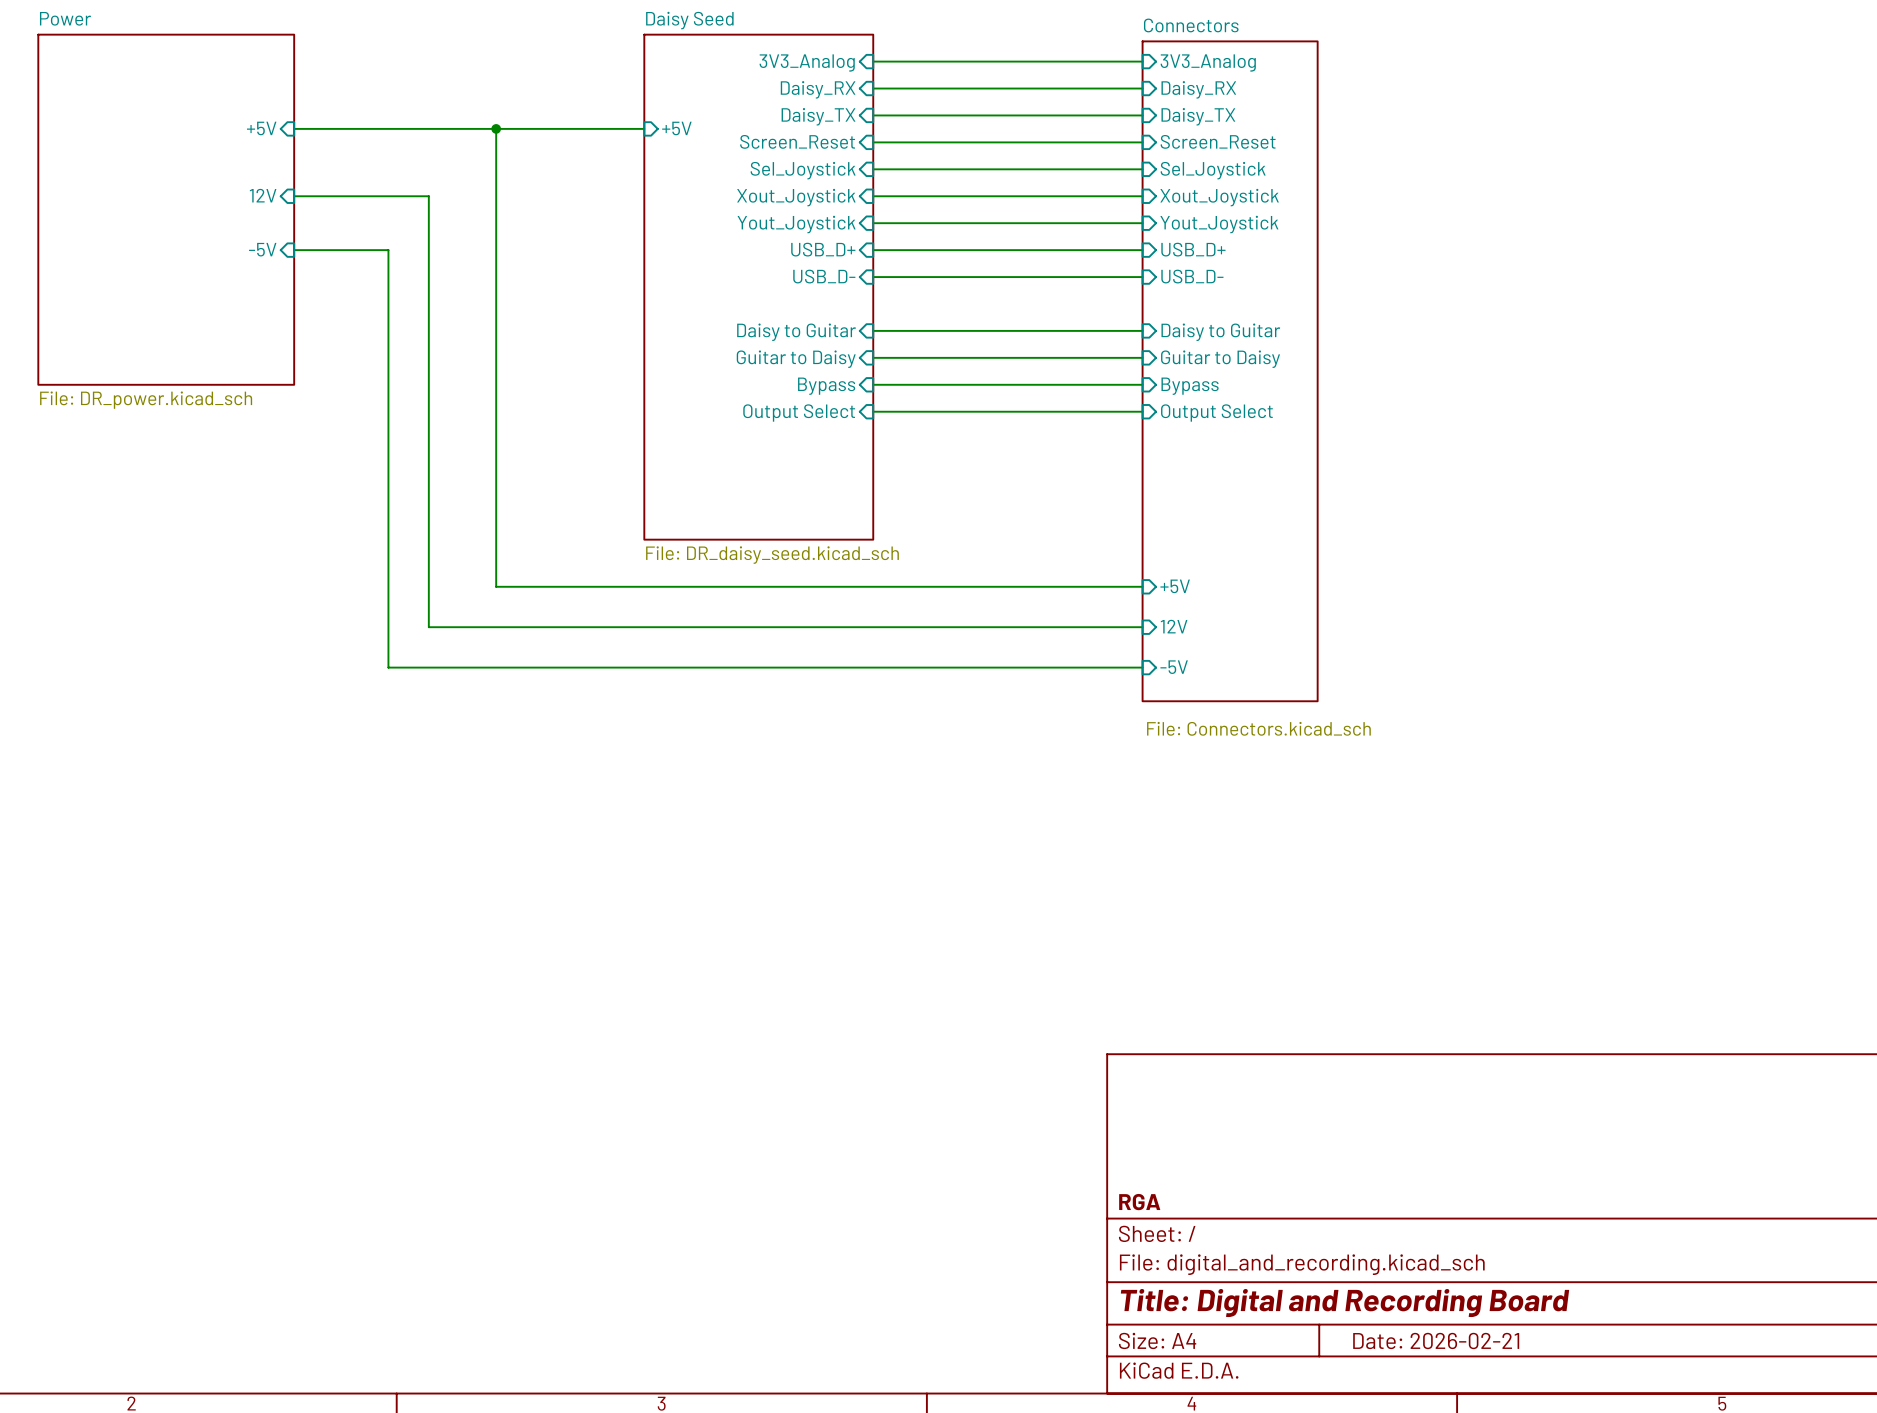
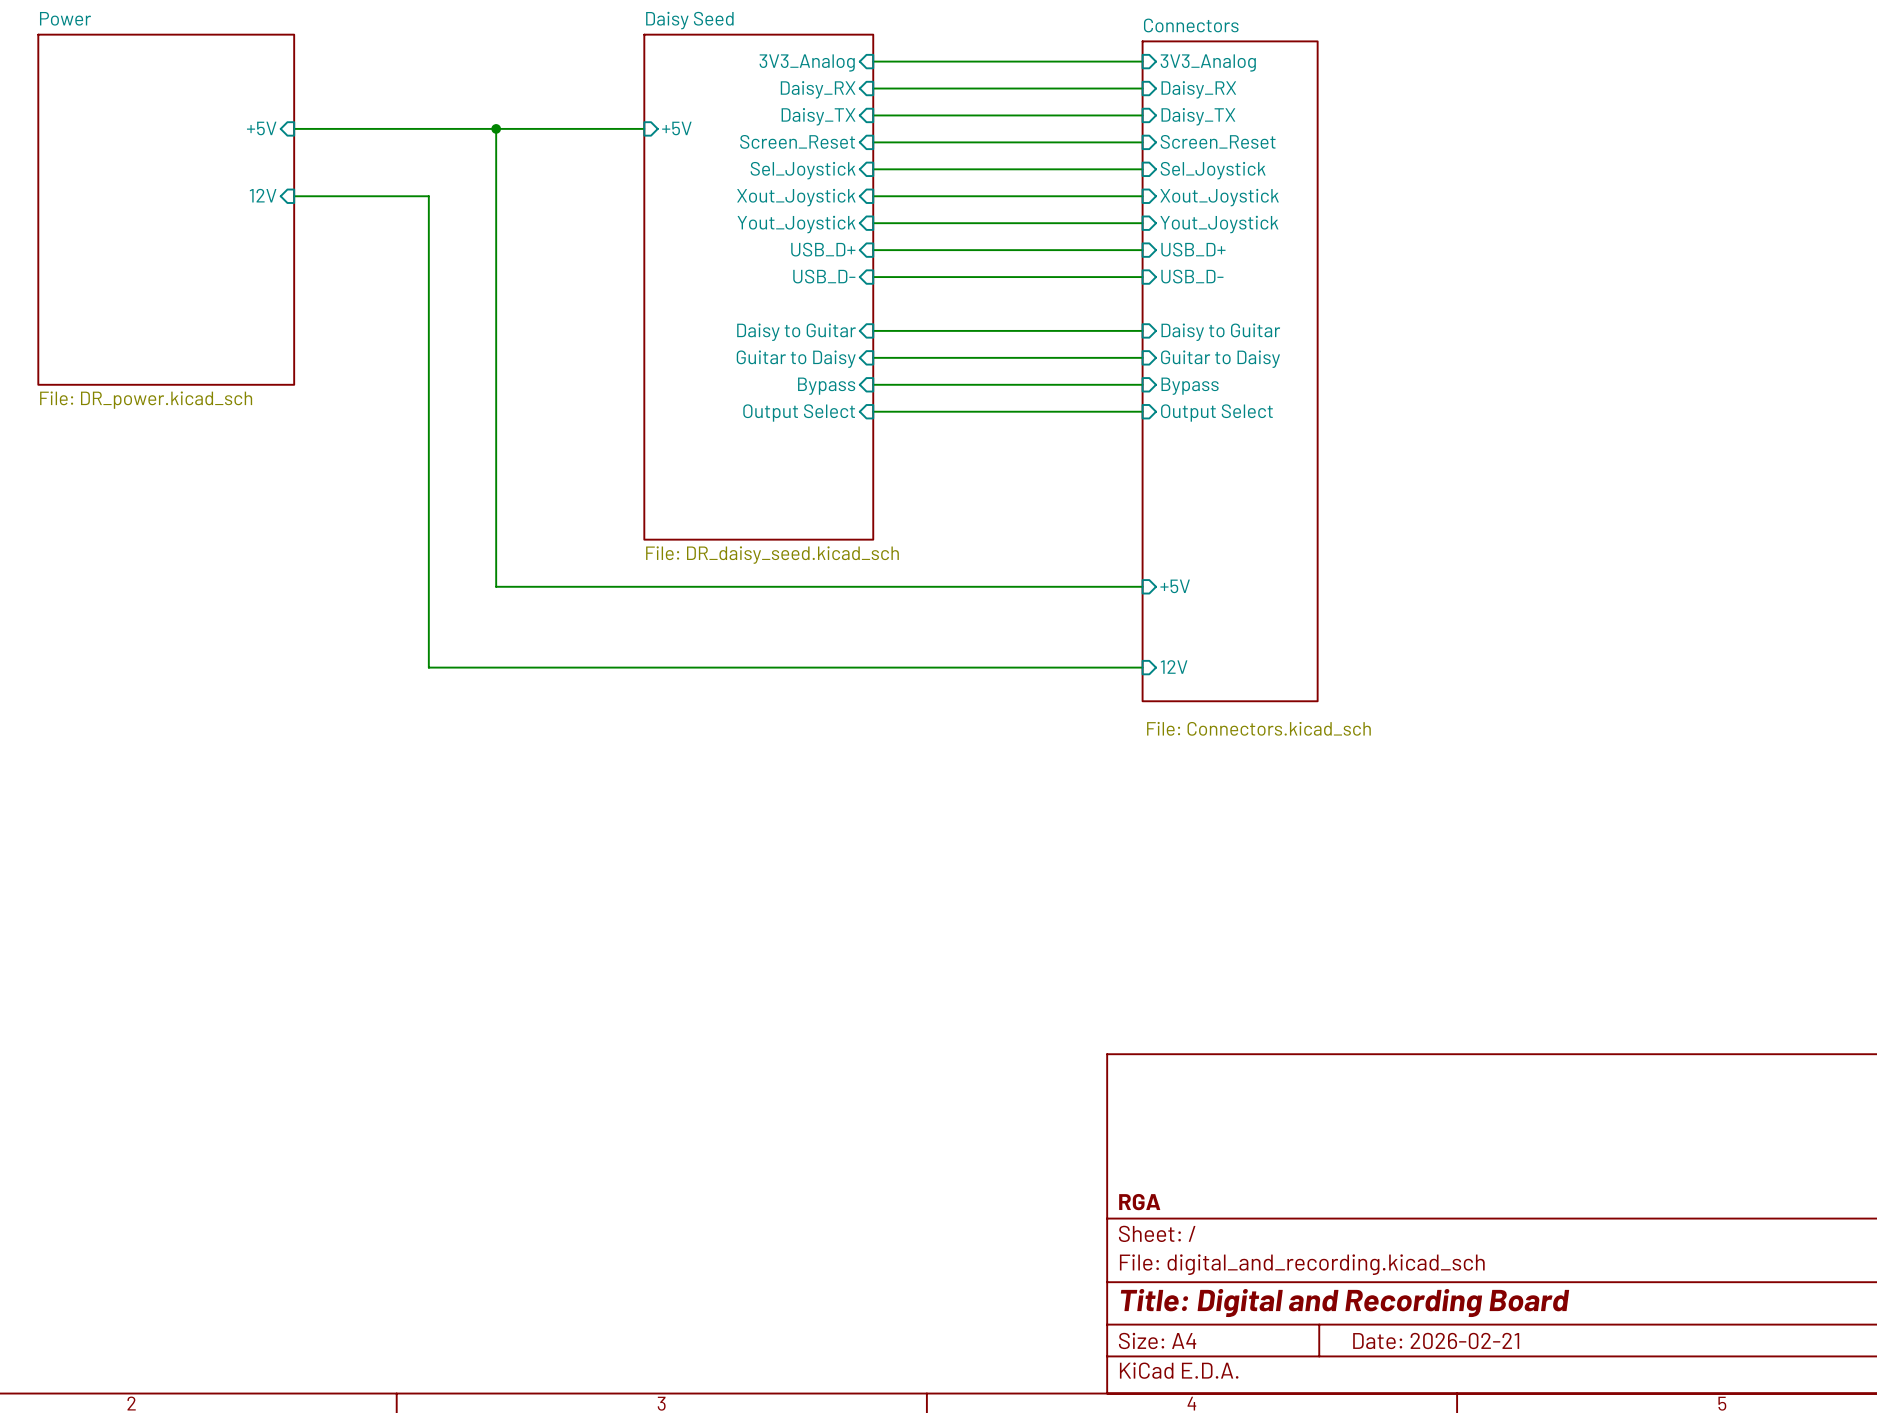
sheet pin: -5V (262, 249) -> none
wire: (294, 250) (388, 250) (388, 667) (428, 667) -> (428, 627) (428, 667)
sheet pin: 12V (1174, 626) -> none
wire: (428, 627) (1142, 627) -> none
sheet pin: -5V (1174, 667) -> 12V (1174, 667)

